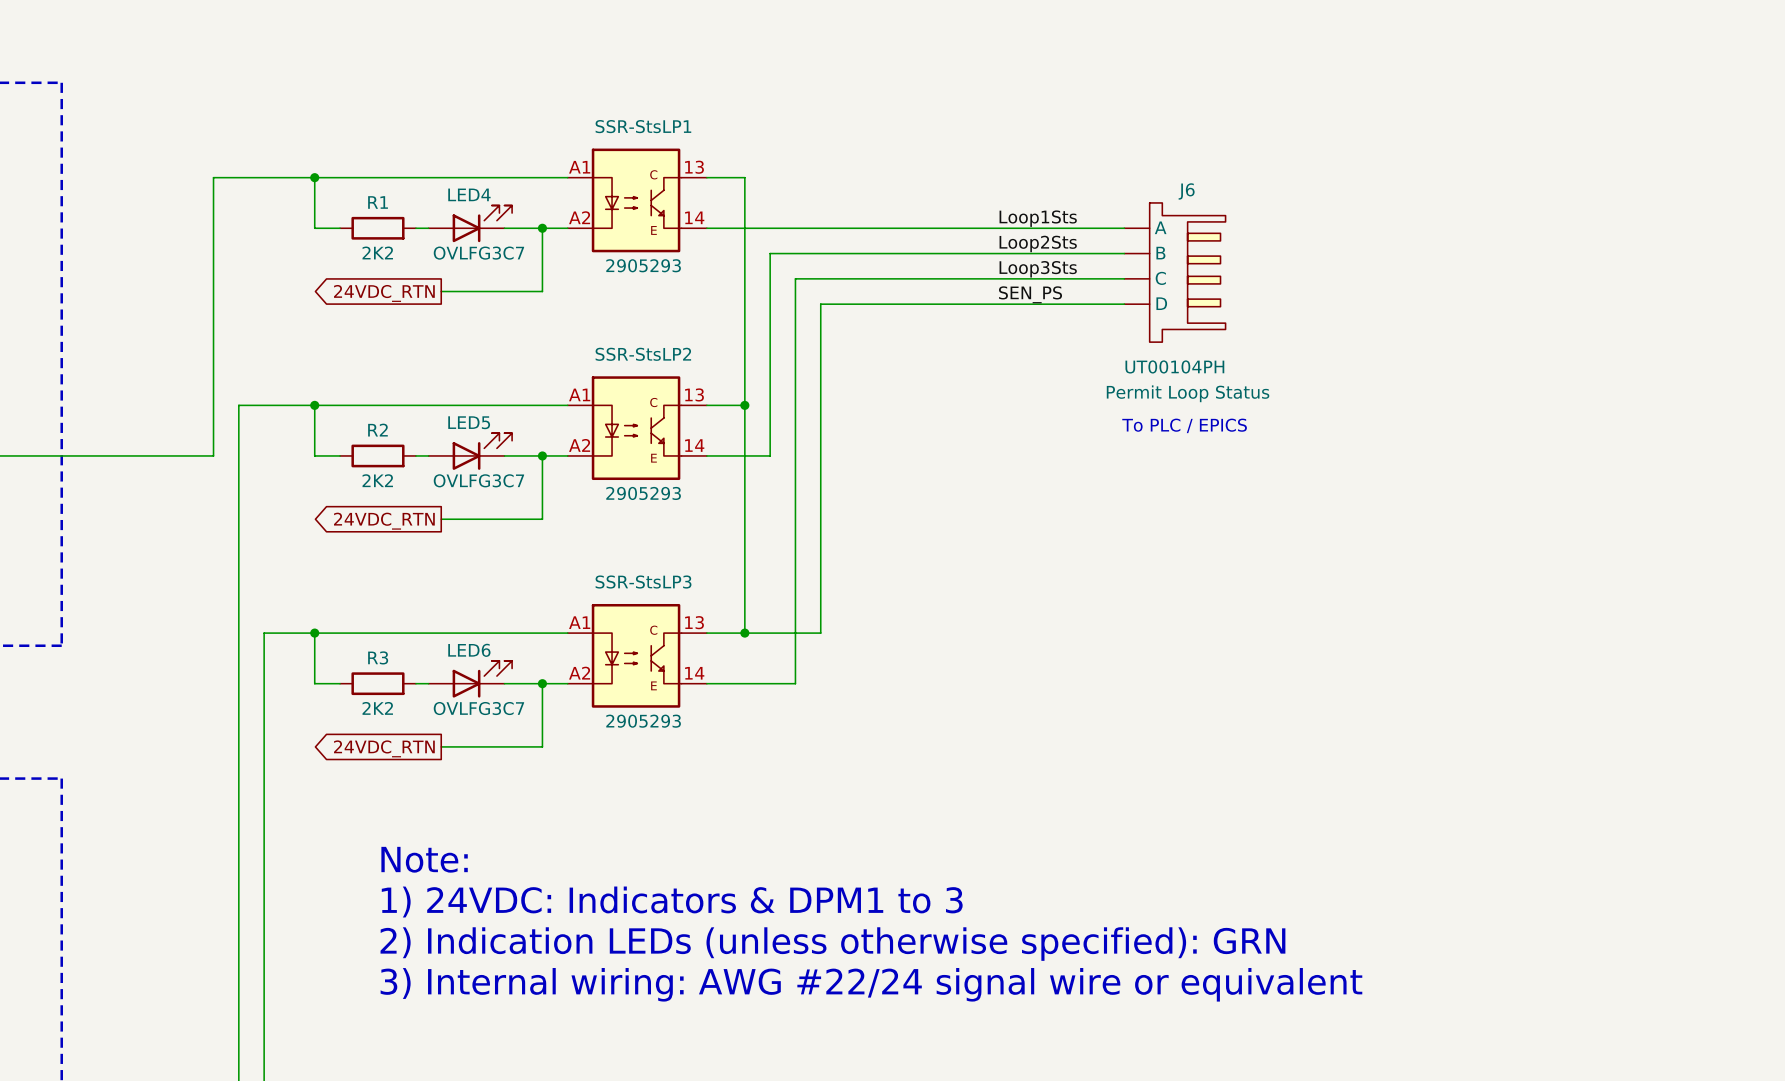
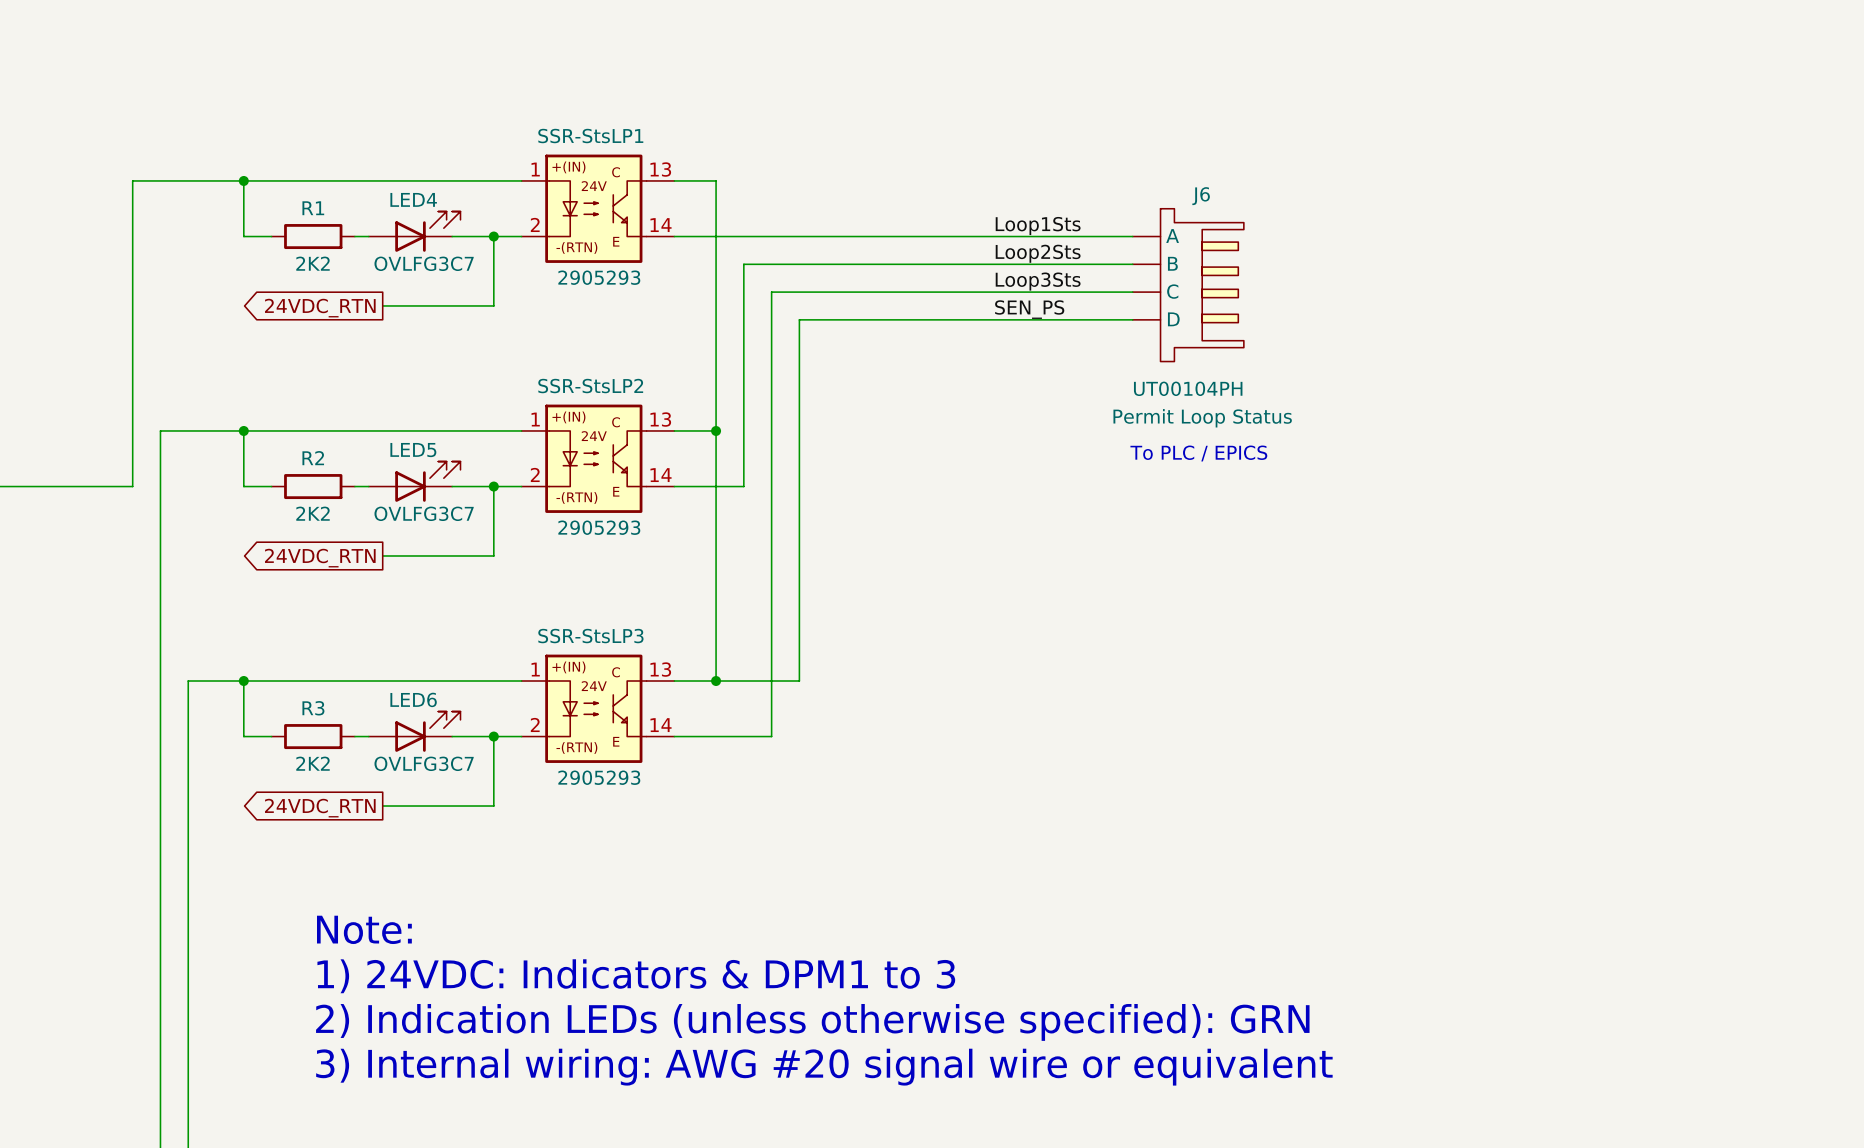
SSR-StsLP1 symbol: [567, 148, 707, 253] -> [521, 154, 675, 263]
SSR-StsLP2 symbol: [567, 376, 707, 481] -> [521, 404, 675, 513]
SSR-StsLP3 symbol: [567, 603, 707, 708] -> [521, 654, 675, 763]
text: 3) Internal wiring: AWG #22/24 signal wire or equivalent (871, 984) -> 3) Internal wiring: AWG #20 signal wire or equivalent (824, 1067)

